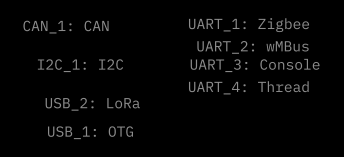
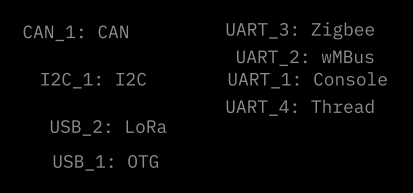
text: UART_1: Zigbee (249, 25) -> UART_3: Zigbee (300, 30)
text: UART_3: Console (255, 65) -> UART_1: Console (307, 80)

